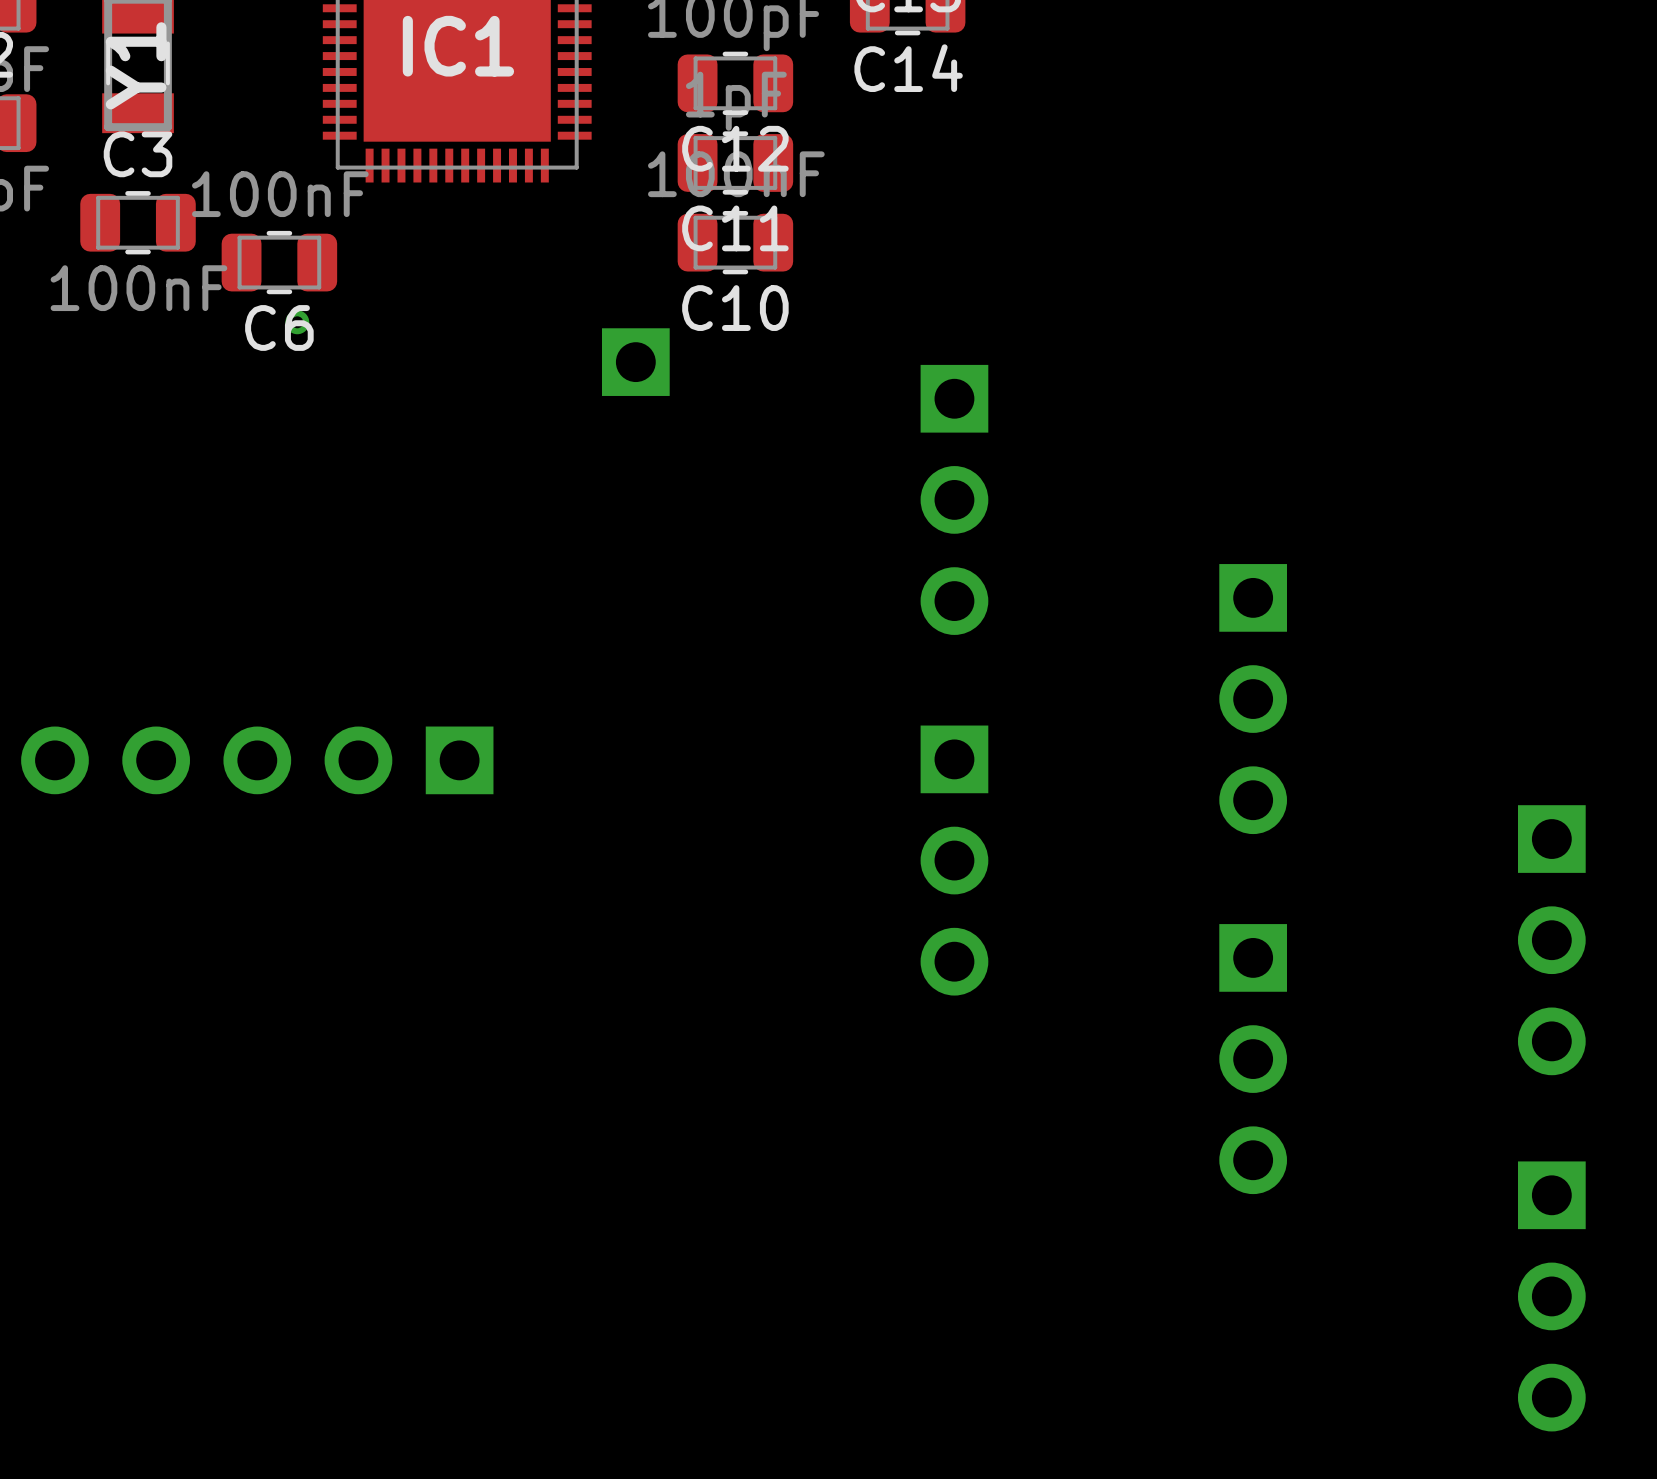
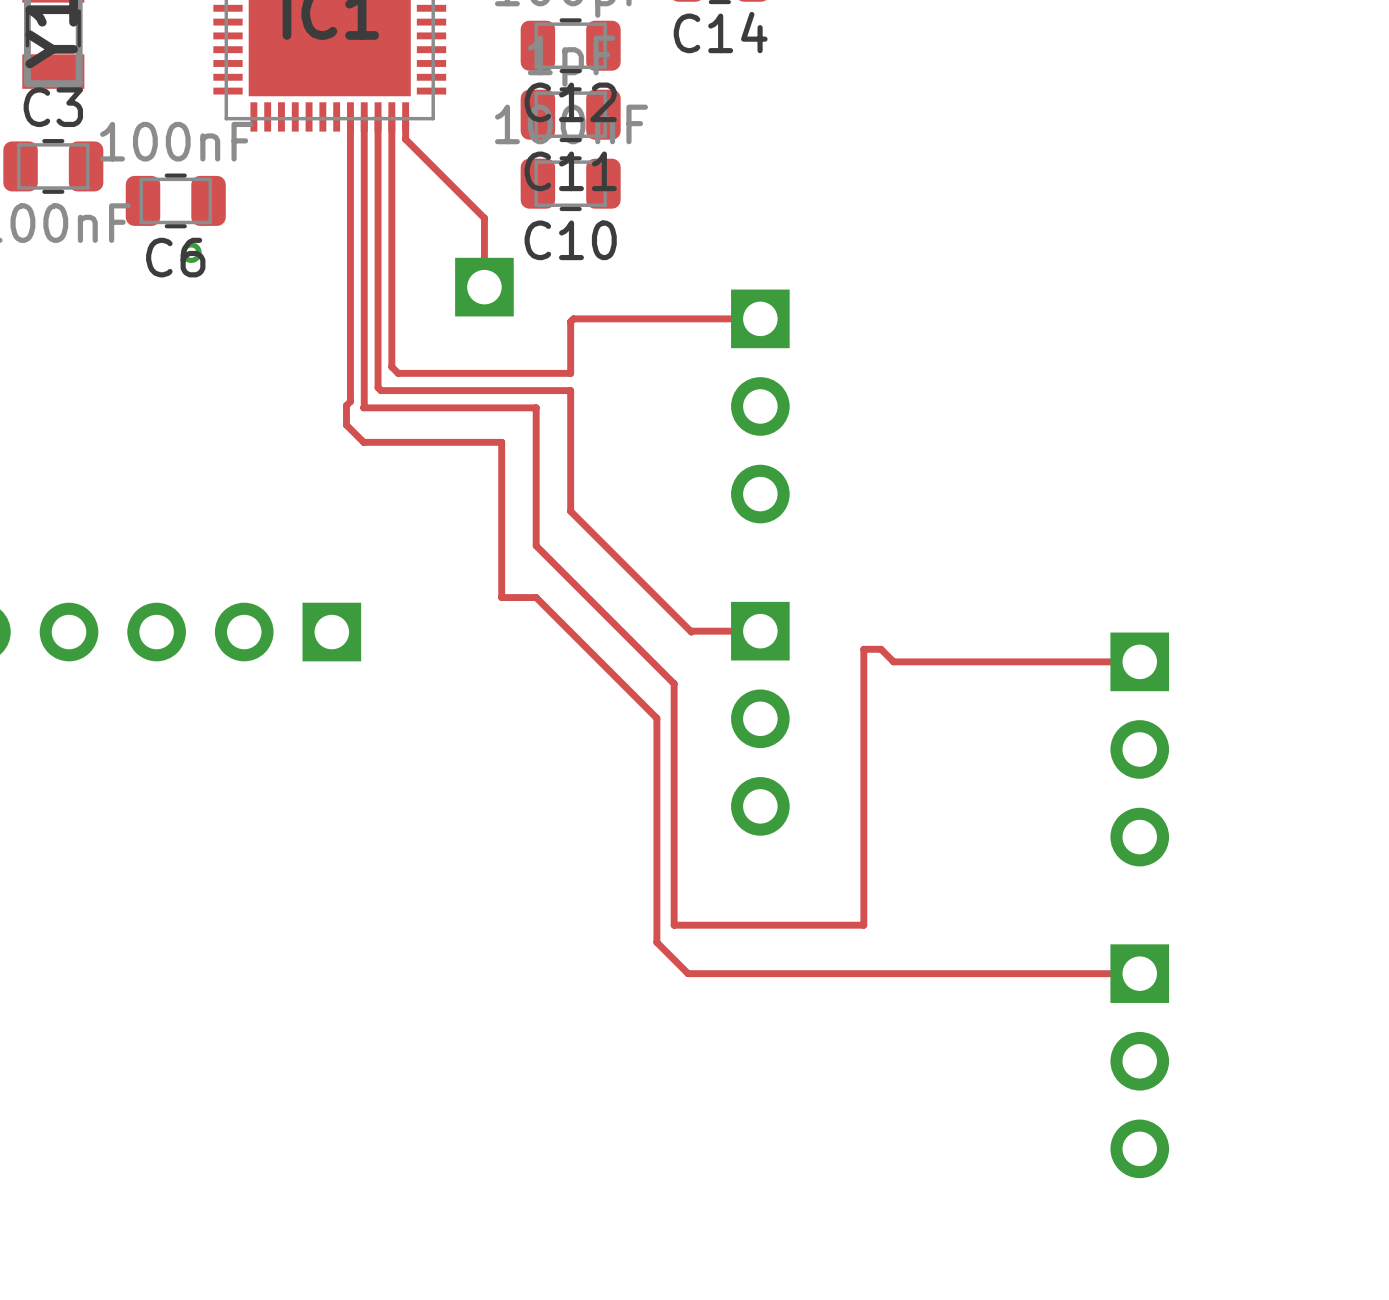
track: none -> (350, 116) (350, 401) (346, 405) (346, 425) (363, 442) (501, 442) (501, 597) (536, 597) (656, 718) (656, 942) (688, 973) (1139, 973)
track: none -> (364, 116) (363, 407) (536, 407) (536, 545) (674, 683) (674, 925) (863, 925) (863, 649) (881, 649) (893, 661) (1139, 661)
track: none -> (378, 116) (378, 387) (380, 390) (570, 390) (570, 511) (691, 632) (760, 631)
track: none -> (391, 116) (391, 366) (398, 373) (570, 373) (570, 321) (573, 318) (760, 318)
track: none -> (405, 116) (405, 139) (484, 218) (484, 287)
part: (1253, 699) -> none
part: none -> (1139, 749)
part: (1551, 940) -> none
part: (1253, 1059) -> none
part: none -> (1139, 1061)
part: (1551, 1296) -> none

